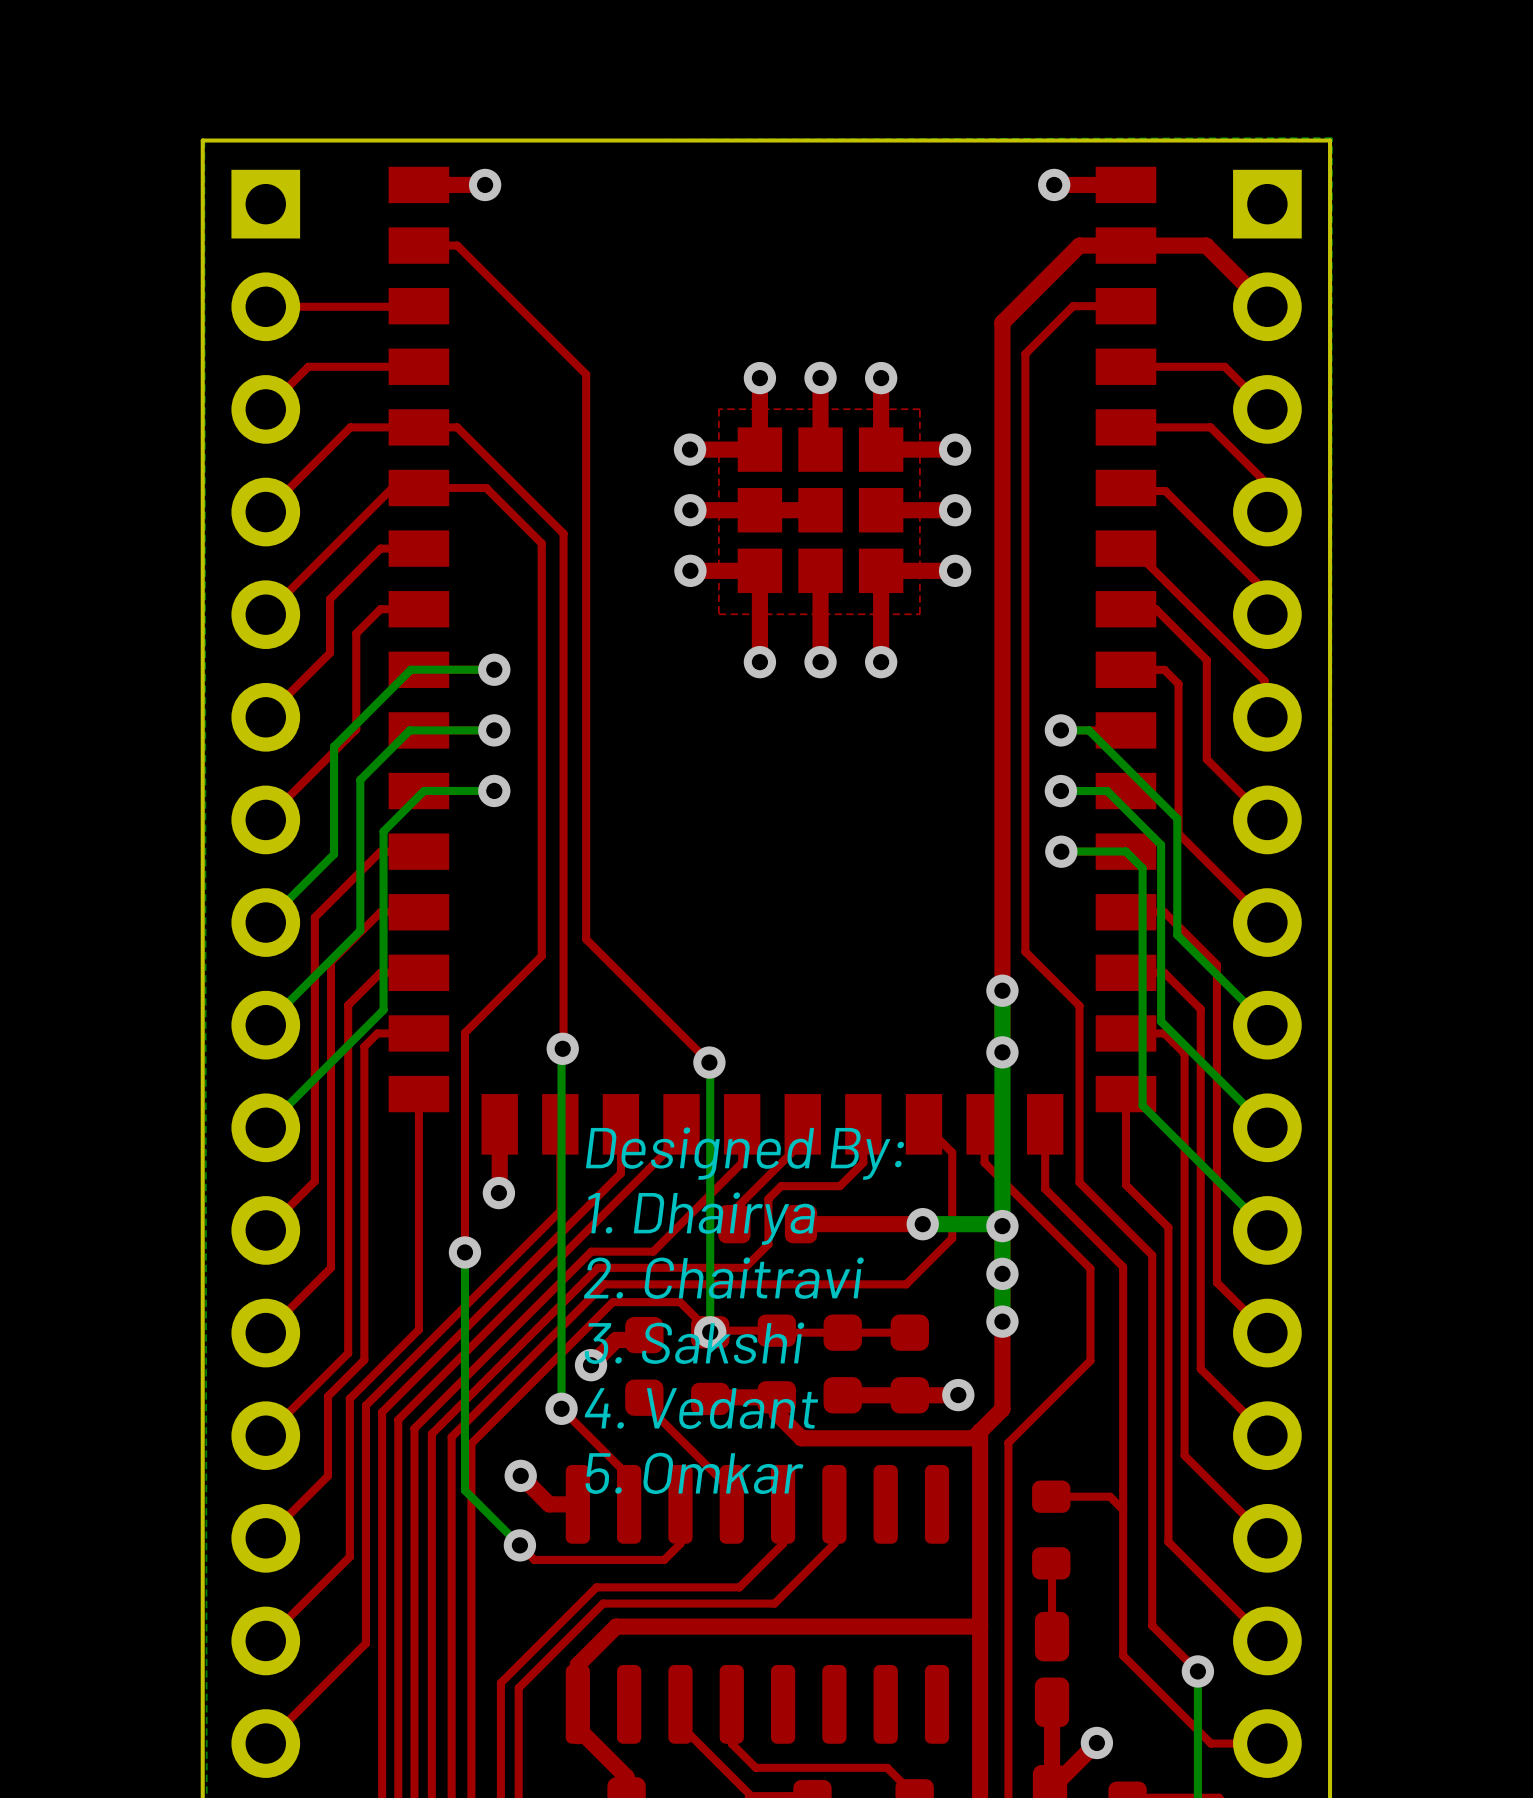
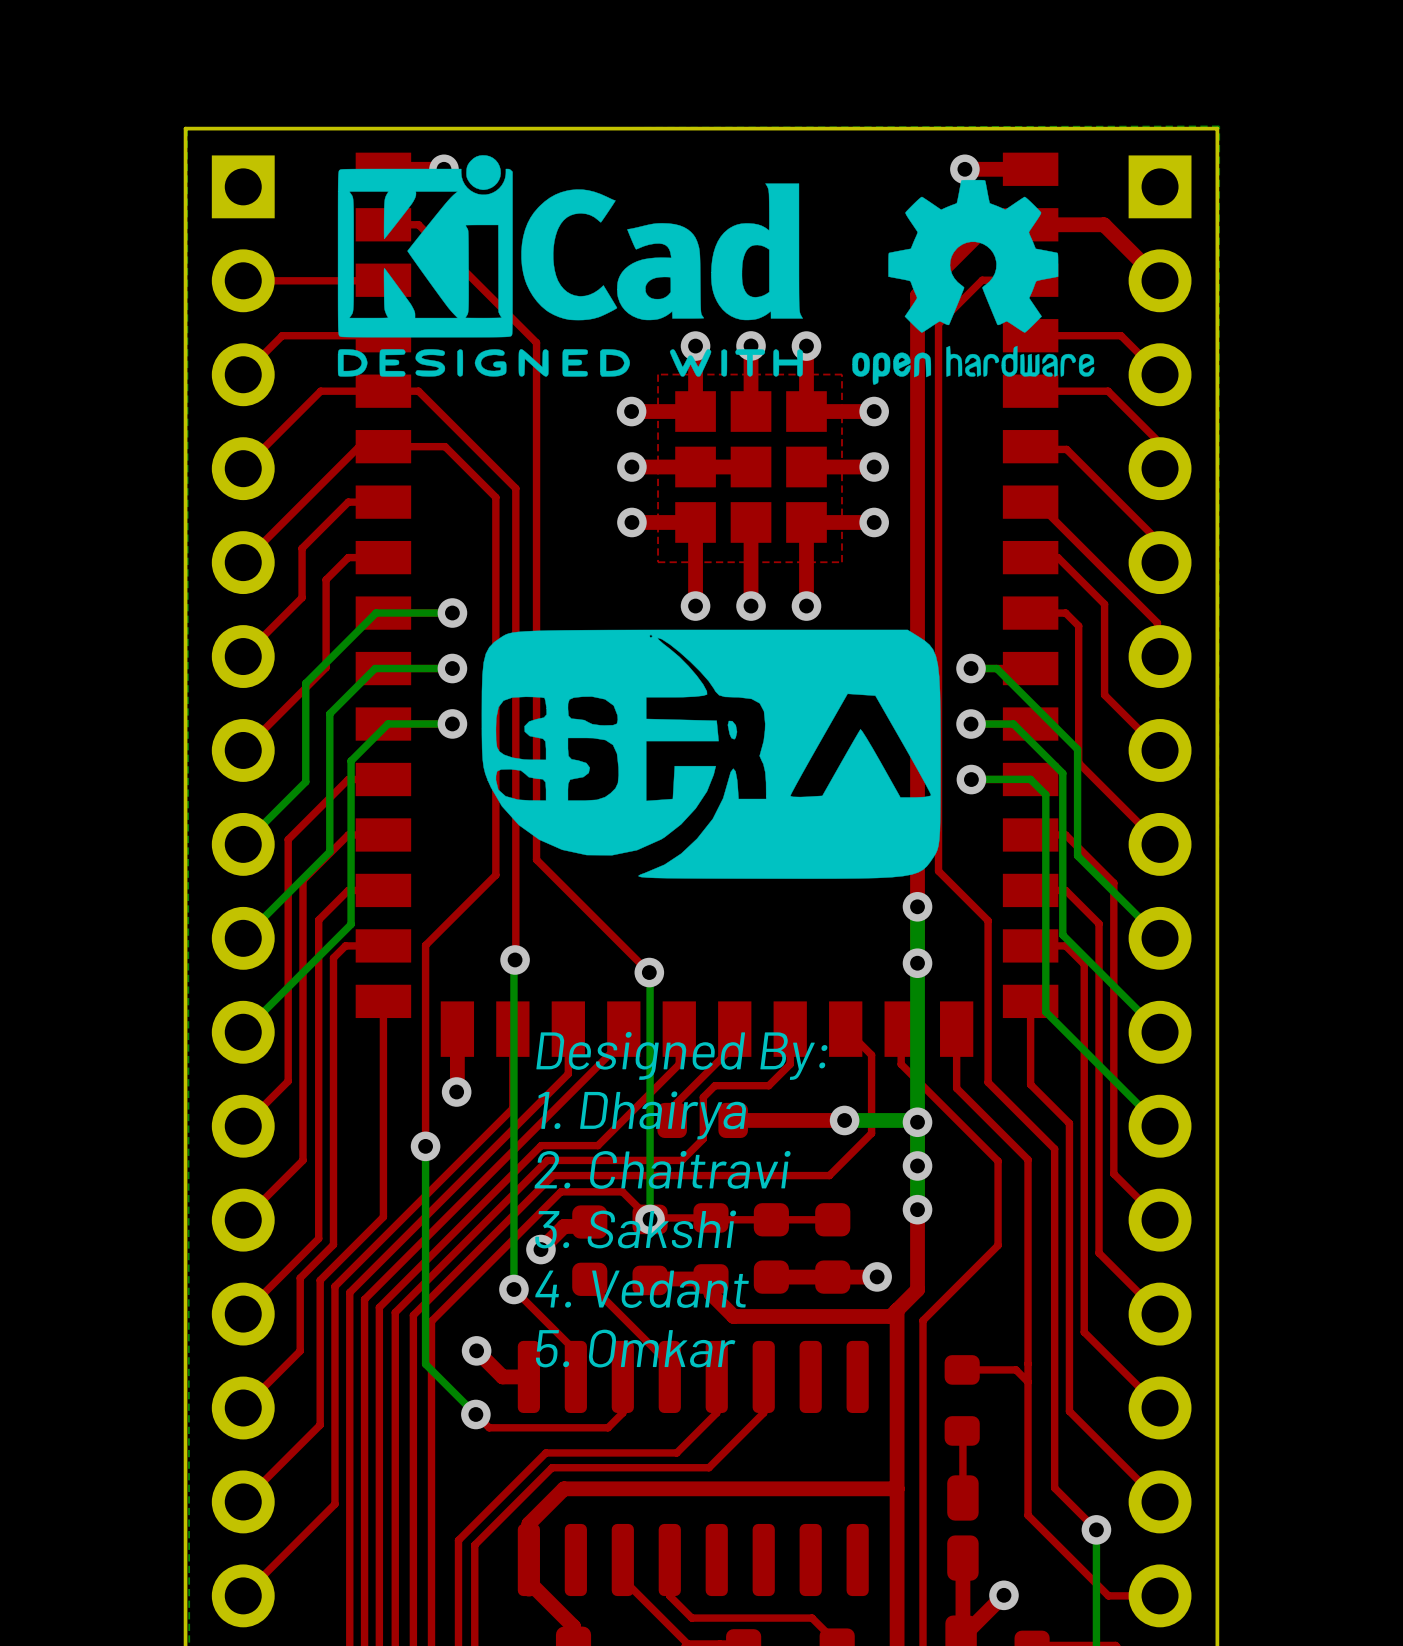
drawing: none -> [337, 155, 803, 377]
drawing: none -> [852, 179, 1095, 385]
drawing: none -> [481, 629, 941, 879]

